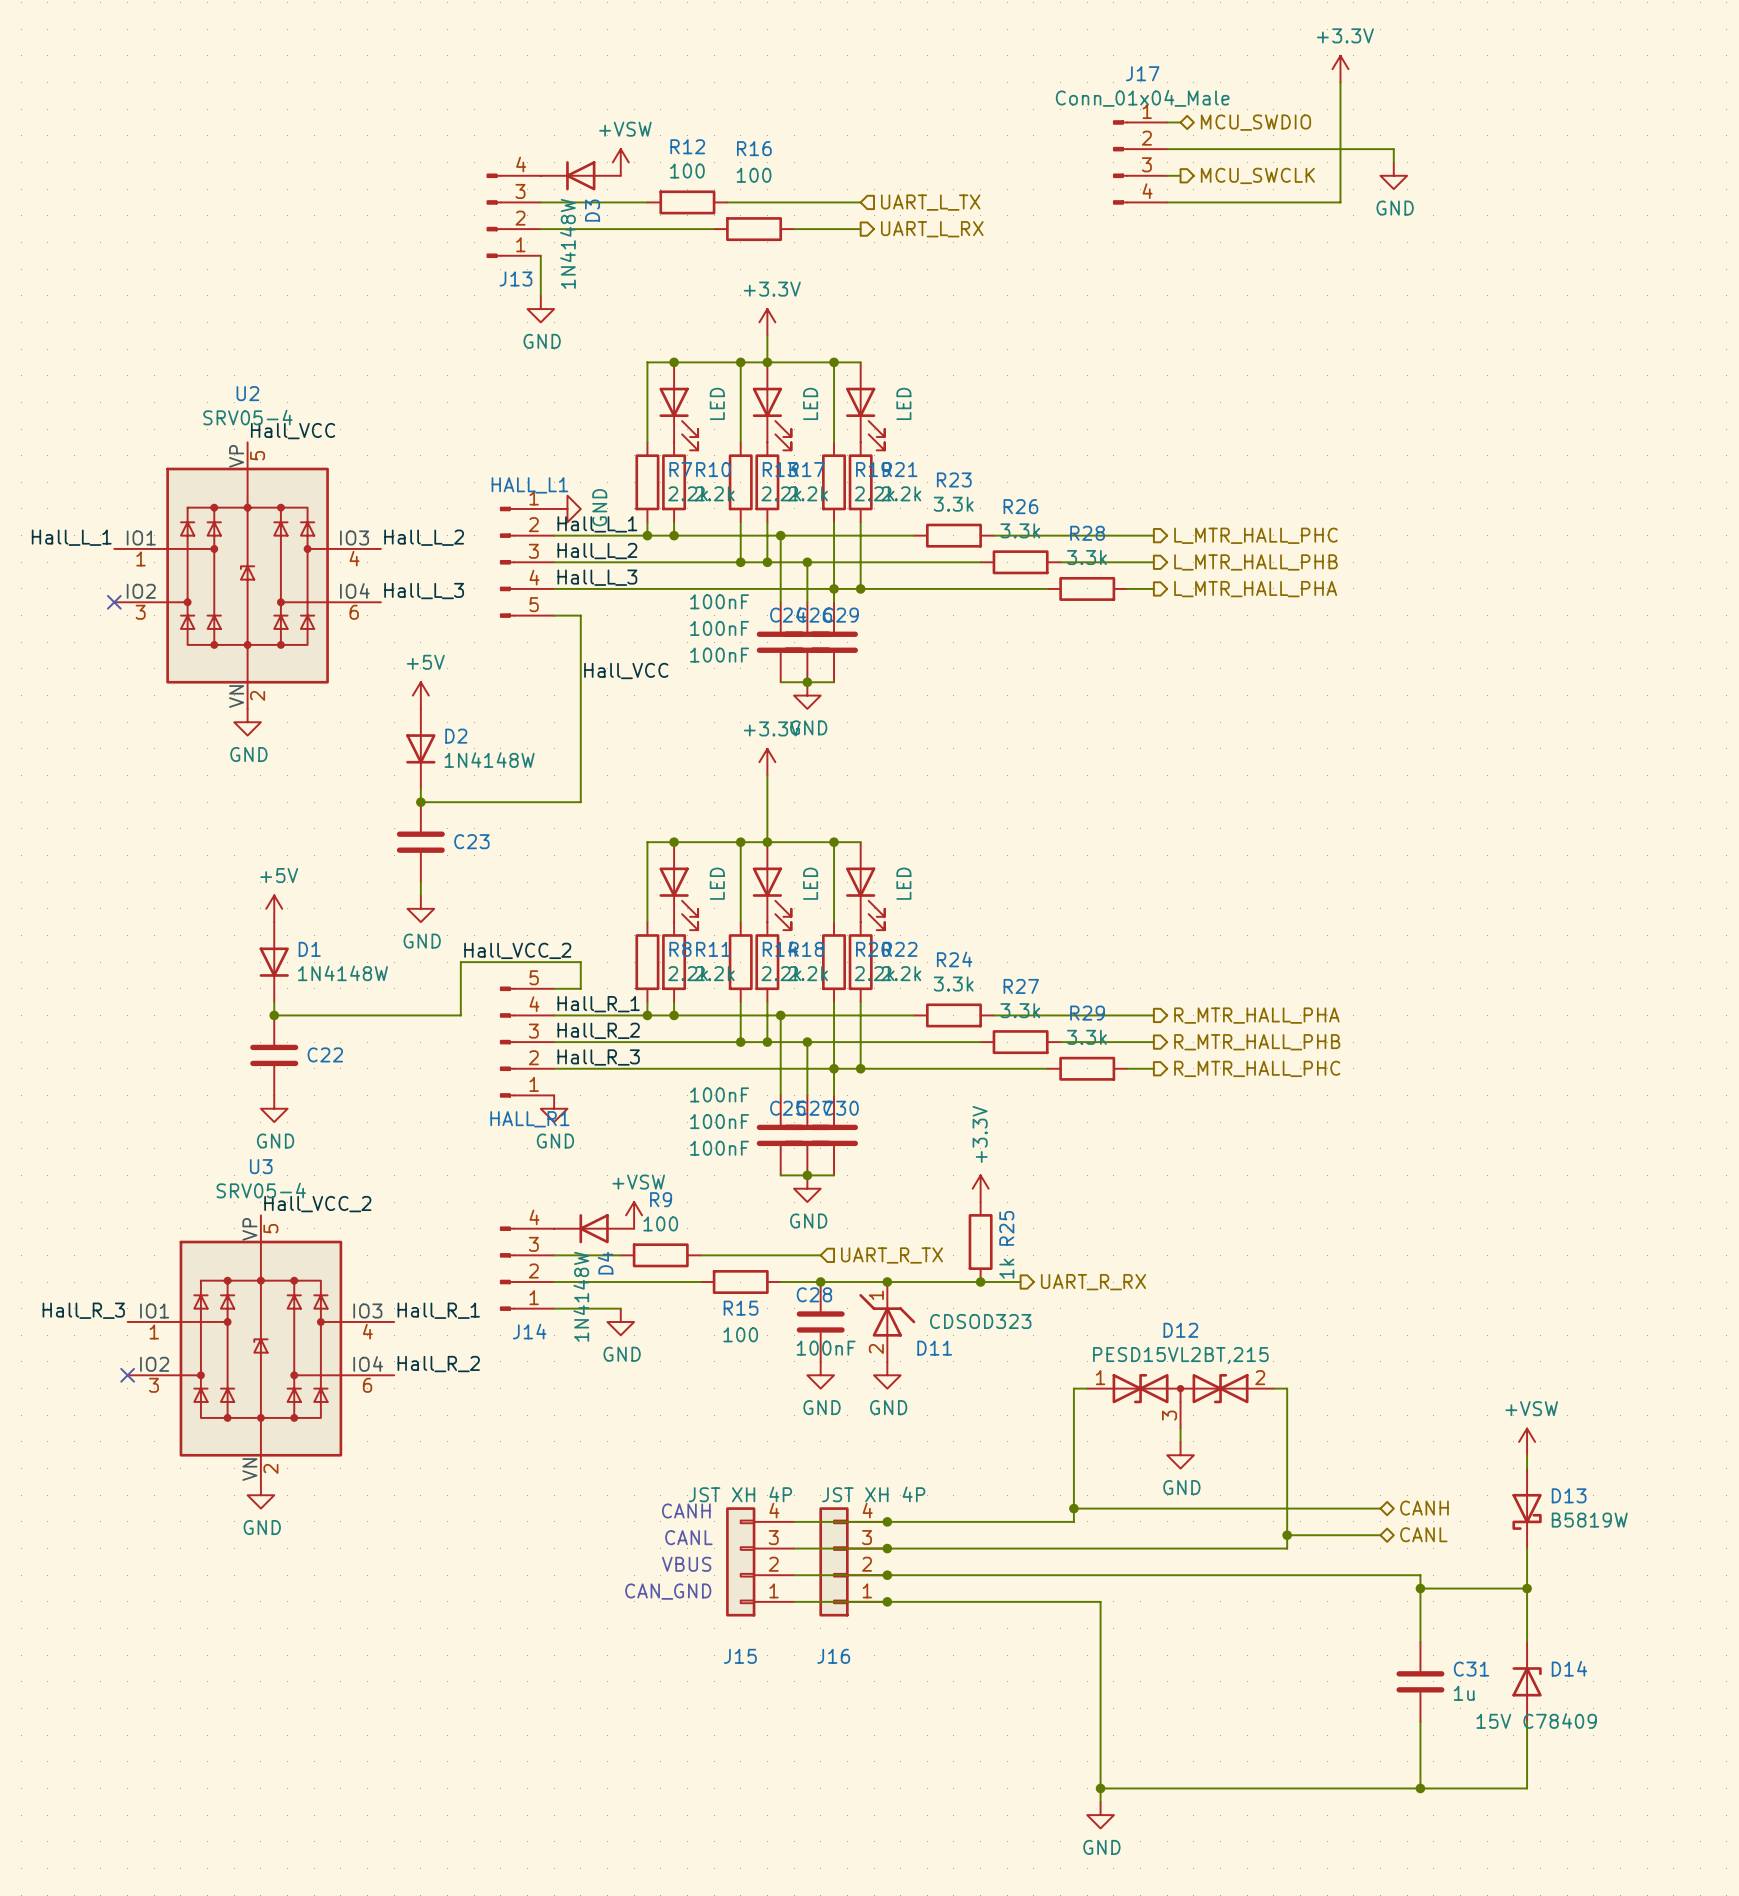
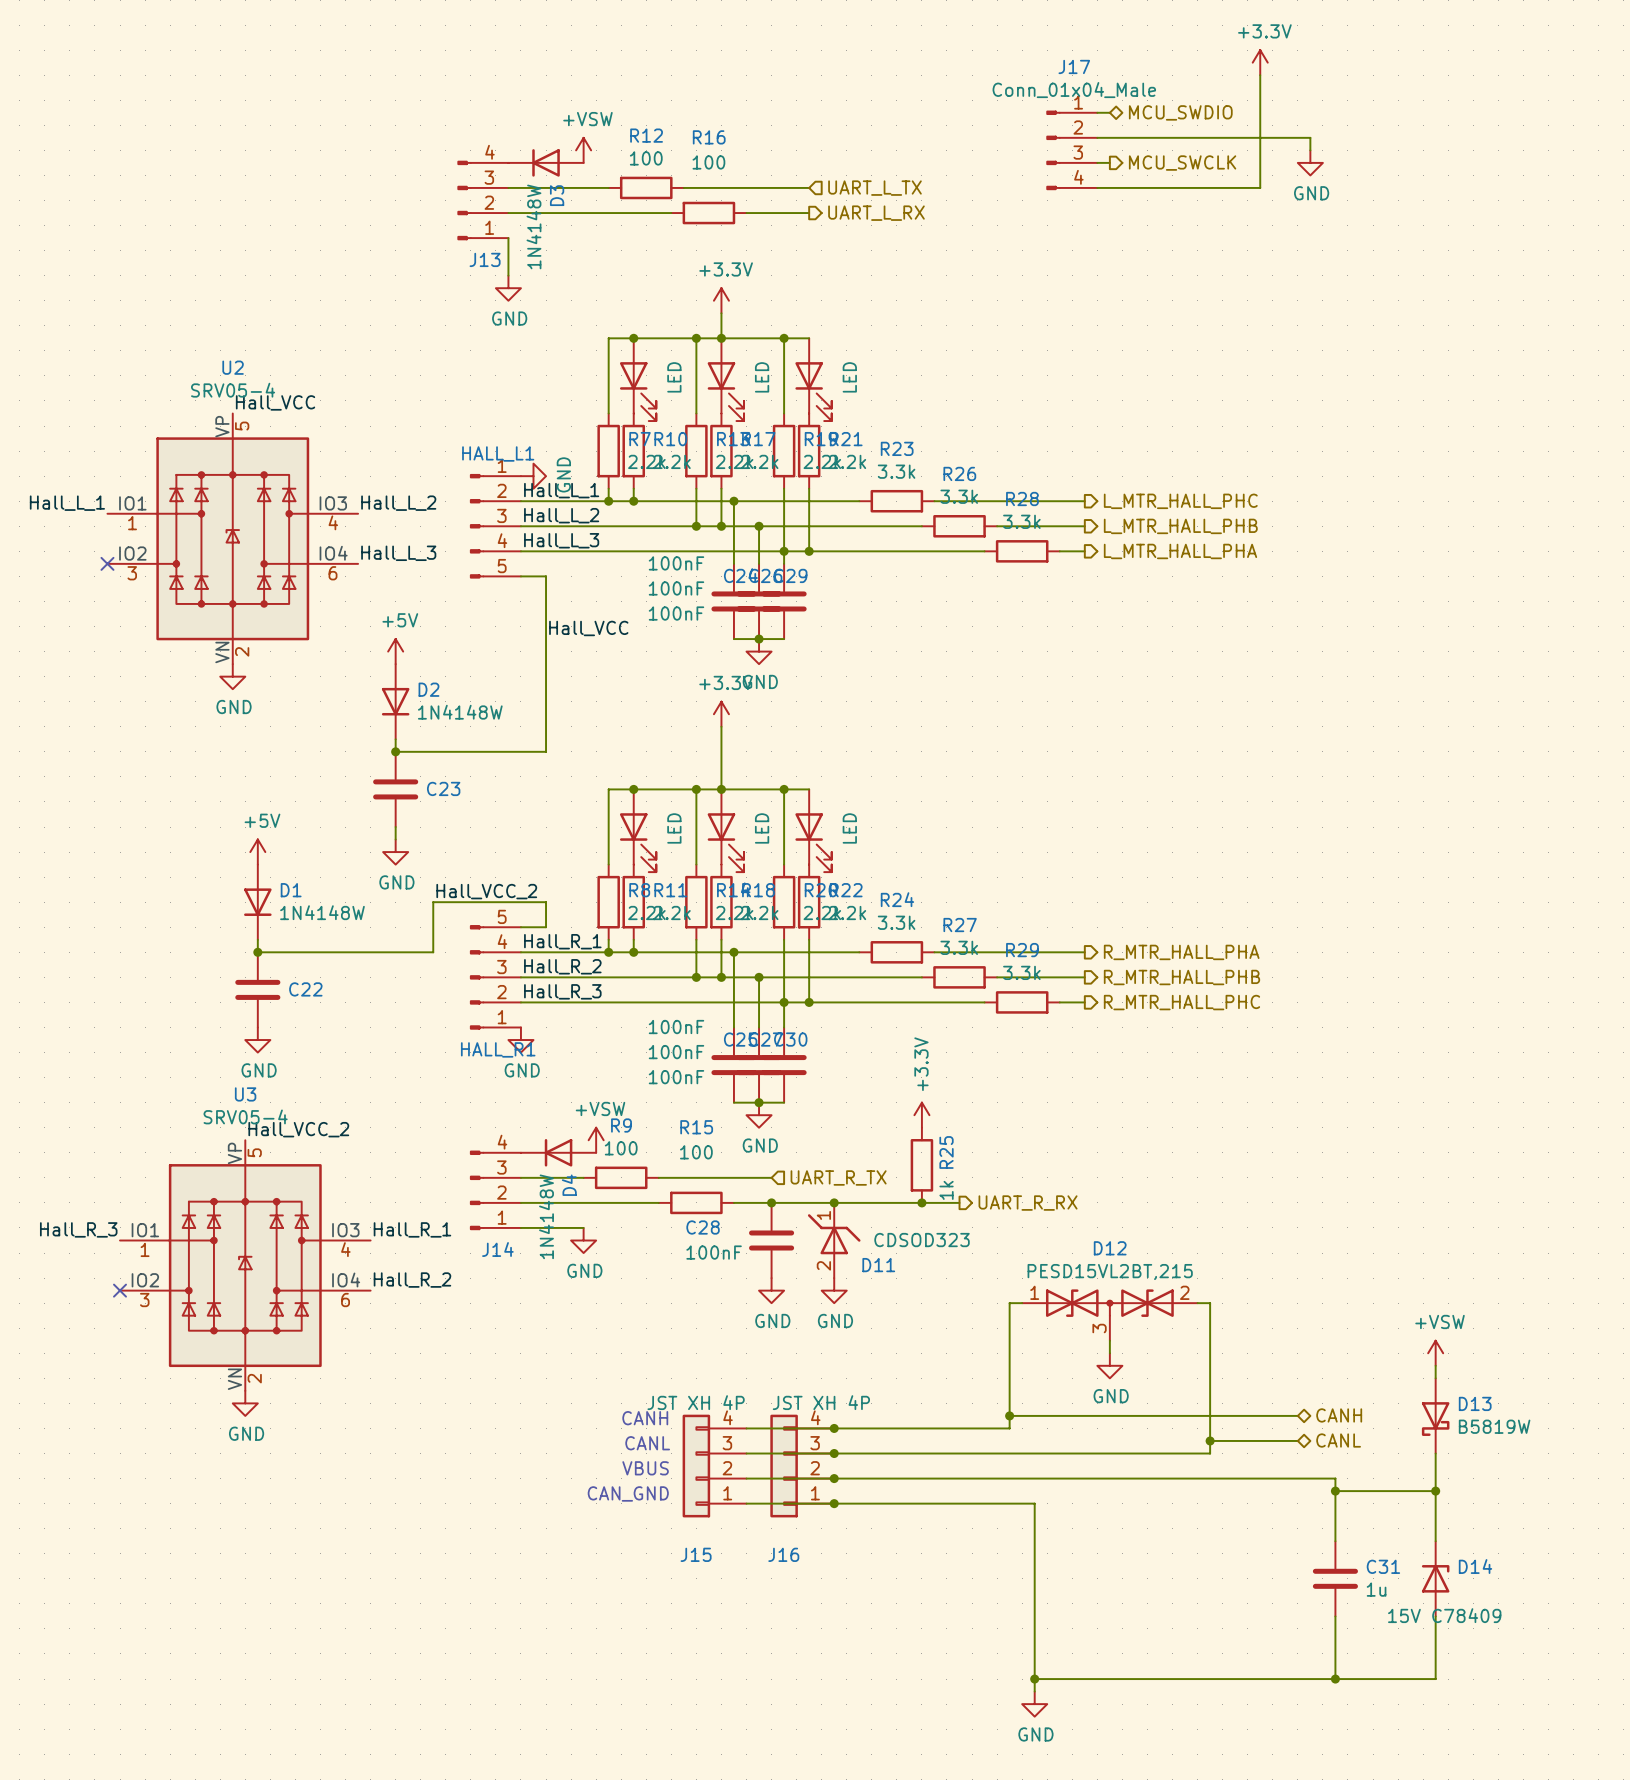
C28 name position: C28 (814, 1294) -> C28 (703, 1227)
R15 name position: R15 (741, 1308) -> R15 (696, 1127)
R15 value position: 100 (740, 1334) -> 100 (696, 1152)
C28 value position: 100nF (826, 1348) -> 100nF (714, 1252)

